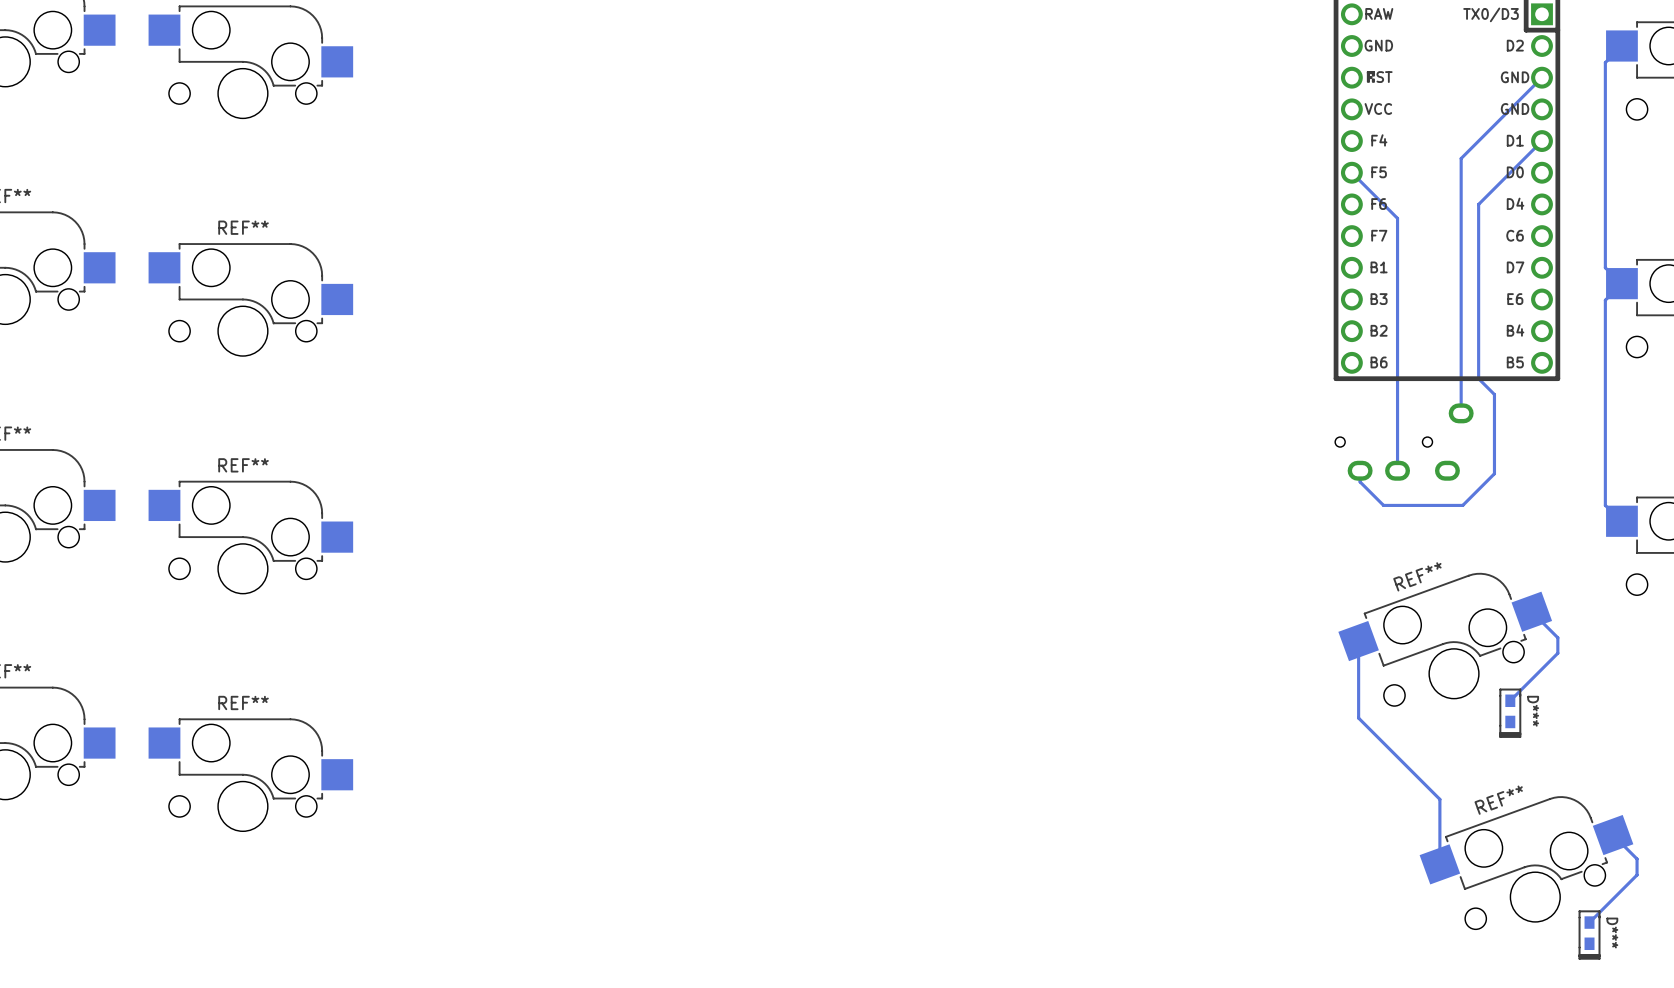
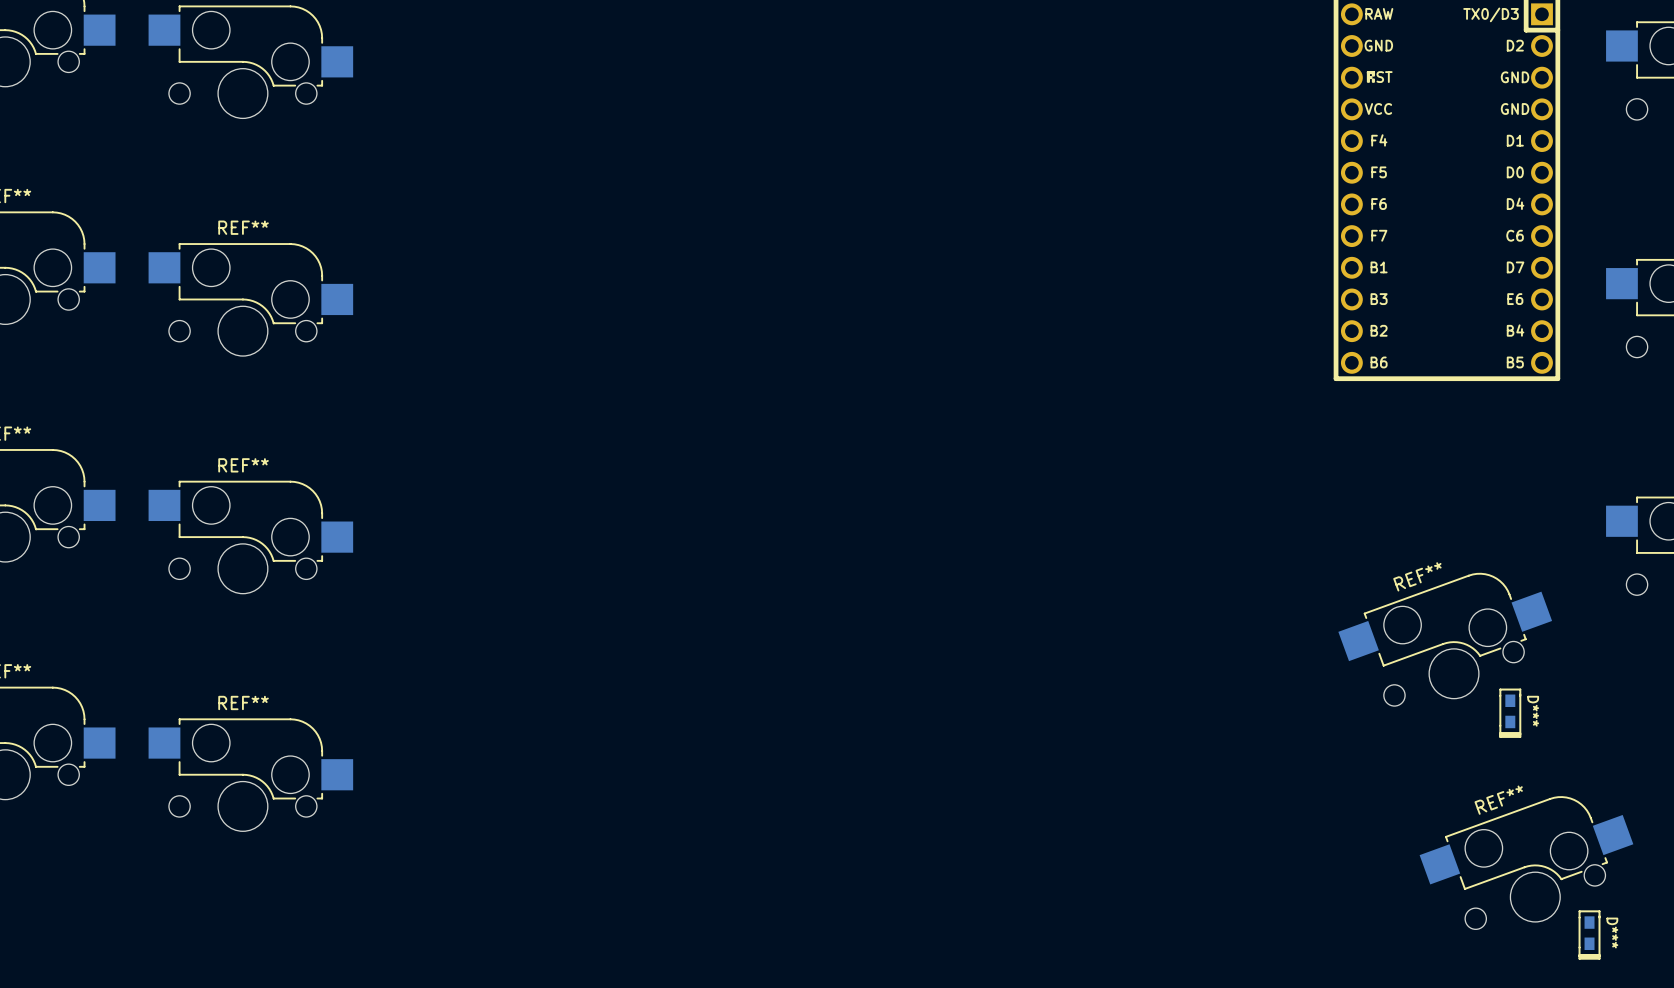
track: (1621, 46) (1605, 62) (1605, 267) (1621, 283) (1605, 300) (1605, 505) (1621, 521) -> none
track: (1542, 77) (1461, 158) (1461, 413) -> none
track: (1542, 141) (1478, 204) (1478, 378) (1494, 394) (1494, 473) (1462, 505) (1383, 505) (1360, 481) (1360, 470) -> none
track: (1351, 172) (1397, 218) (1397, 470) -> none
part: (1404, 442) -> none
track: (1531, 611) (1557, 637) (1557, 653) (1510, 700) -> none
track: (1358, 641) (1358, 718) (1439, 799) (1439, 864) -> none
track: (1613, 835) (1637, 859) (1637, 875) (1589, 922) -> none

